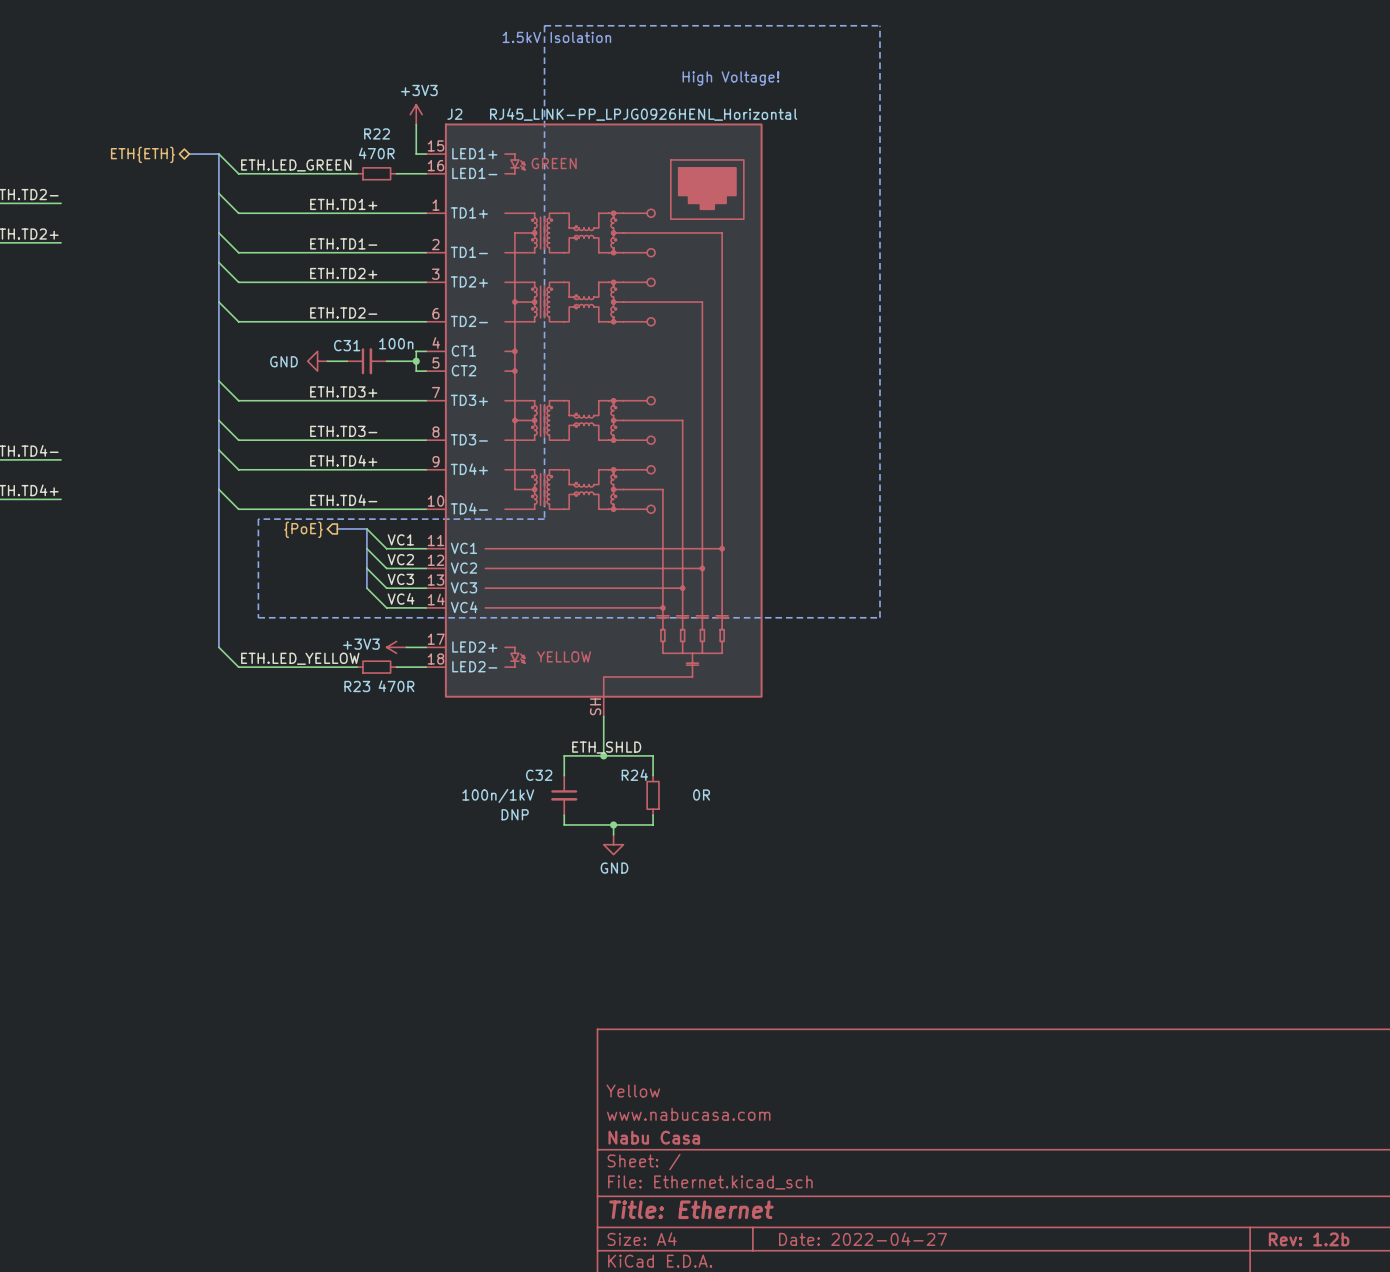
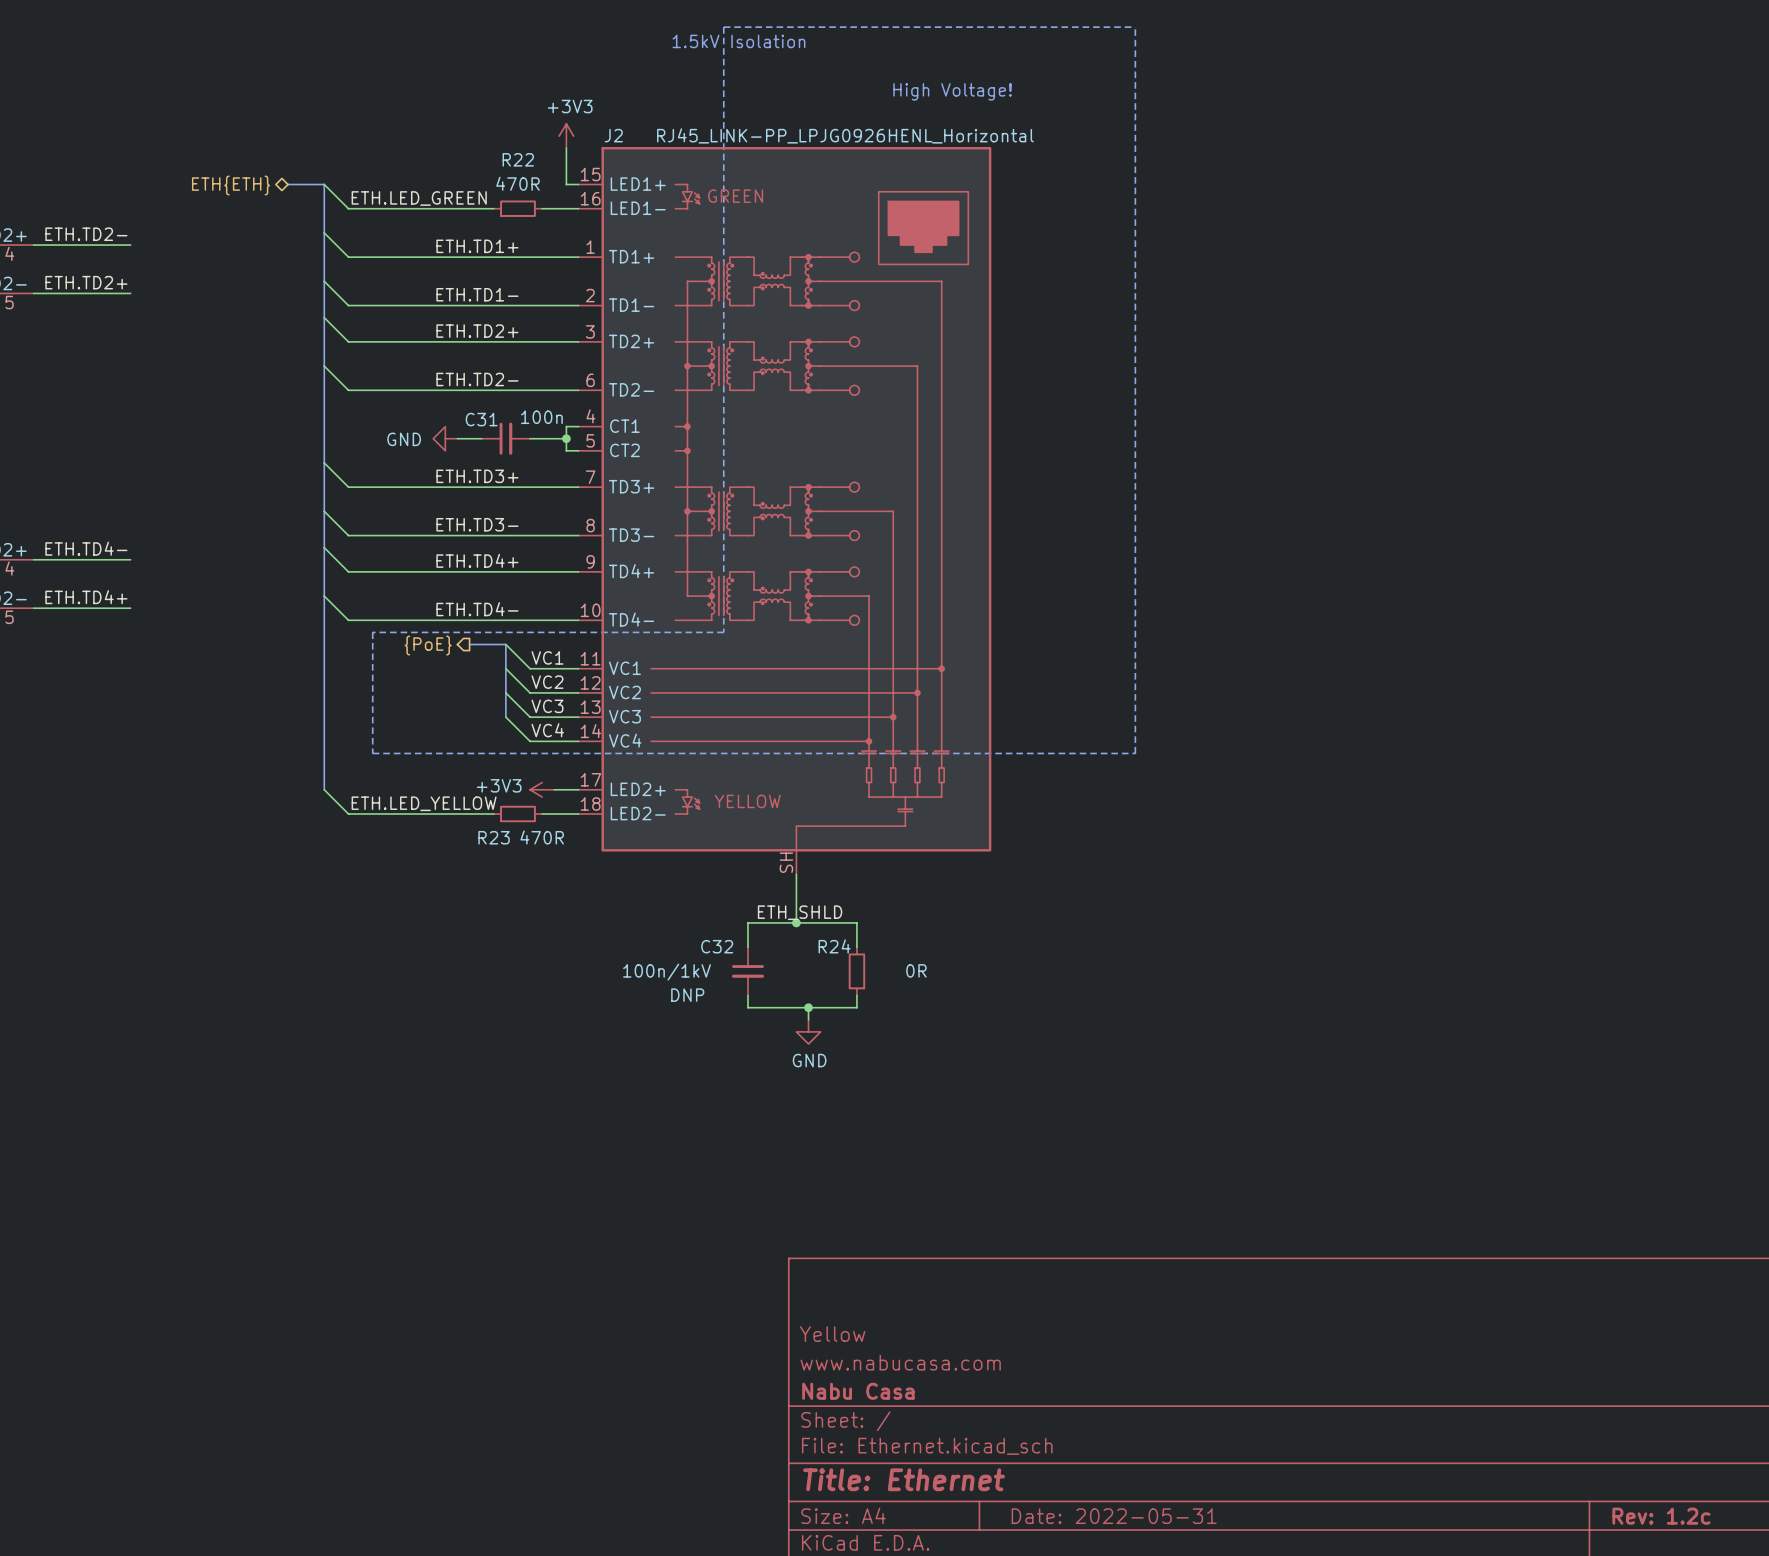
title block: Date: 2022-04-27 (862, 1239) -> Date: 2022-05-31 (1114, 1516)
title block: Rev: 1.2b (1309, 1239) -> Rev: 1.2c (1661, 1516)

